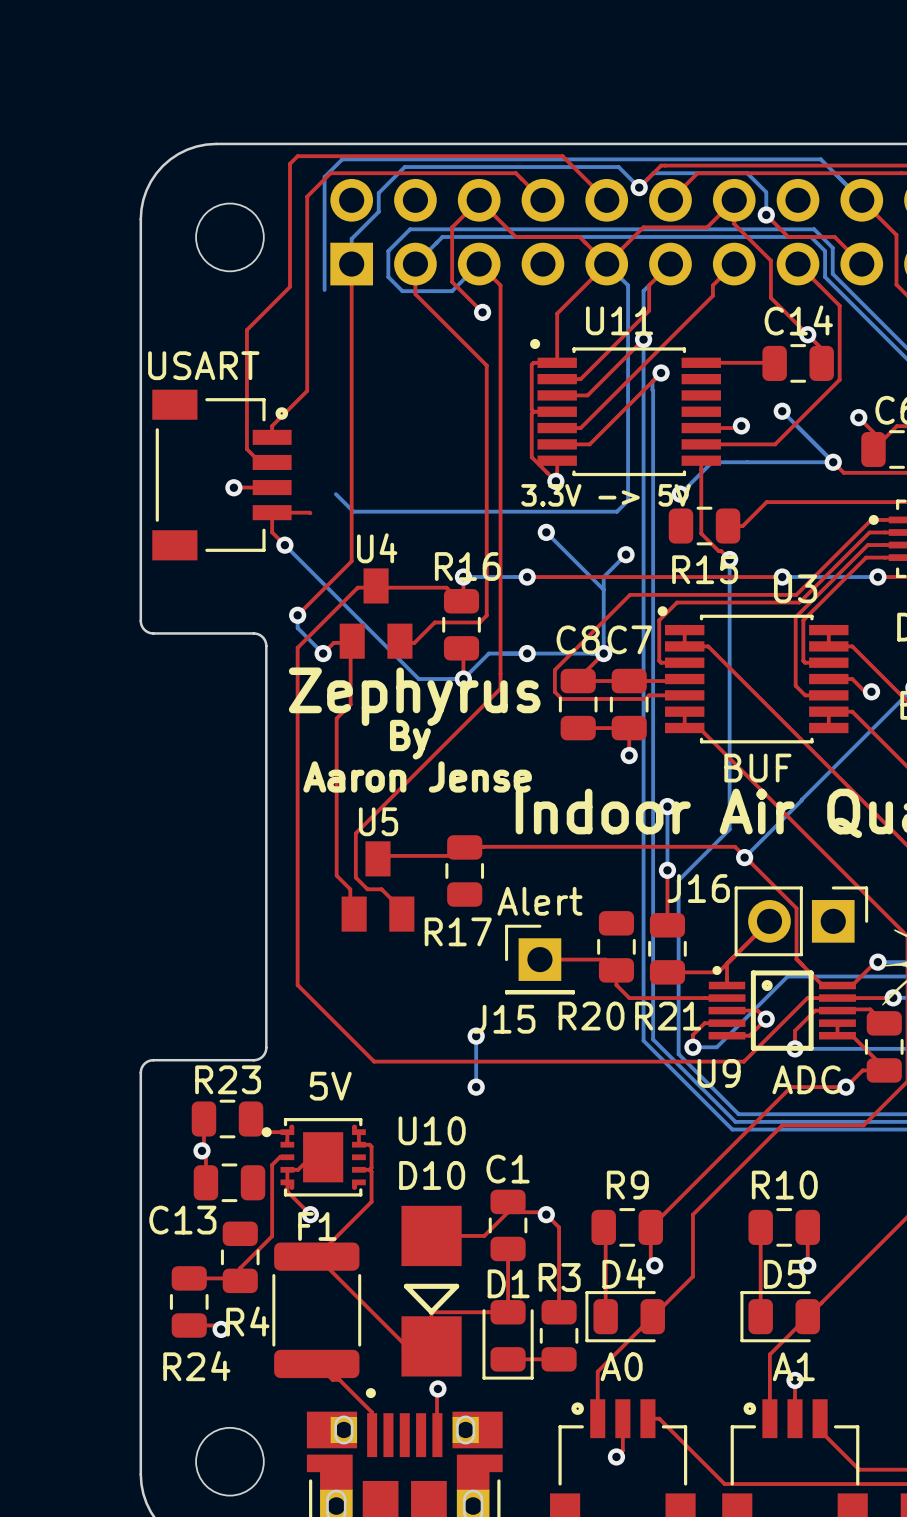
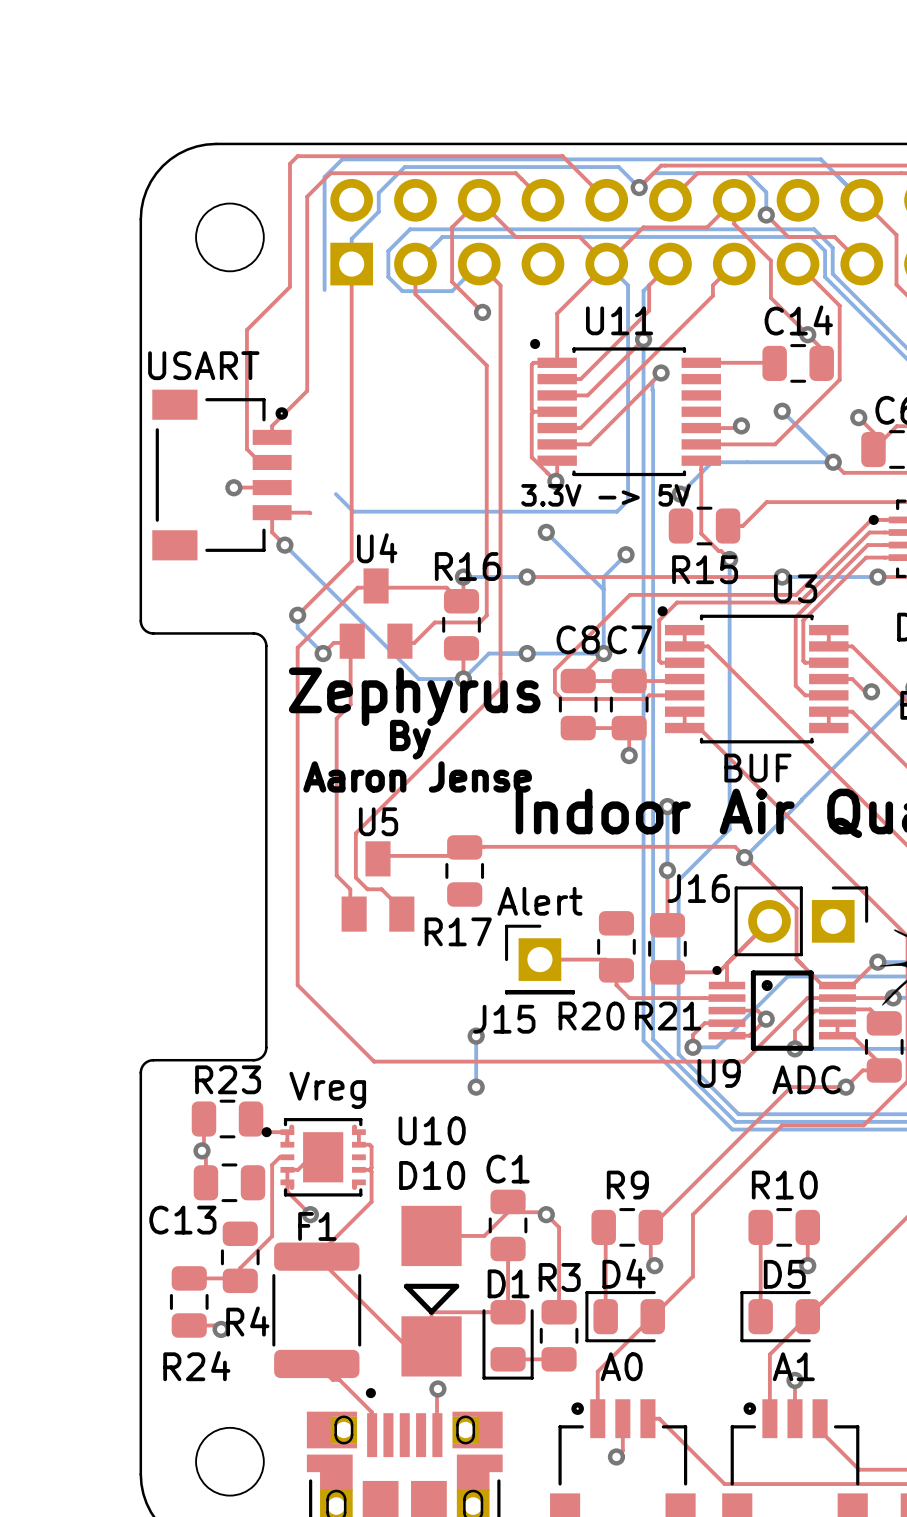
U10 value: 5V (330, 1086) -> Vreg (327, 1090)

